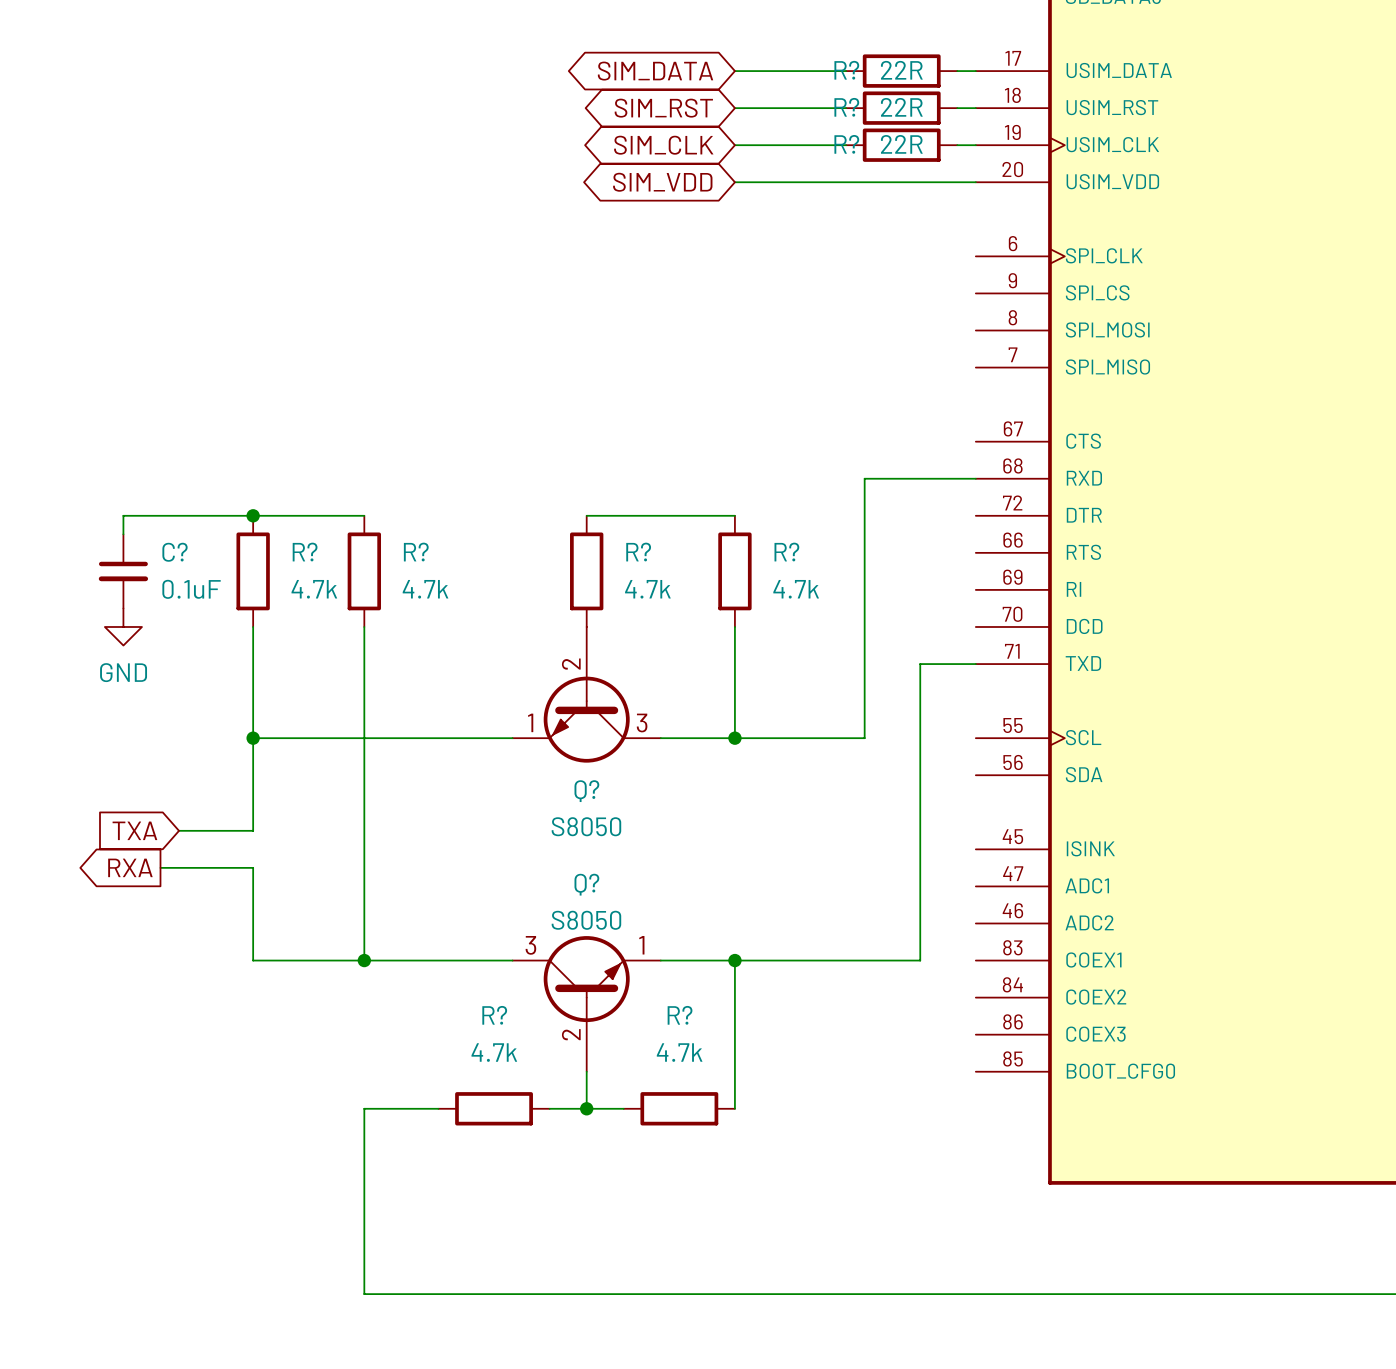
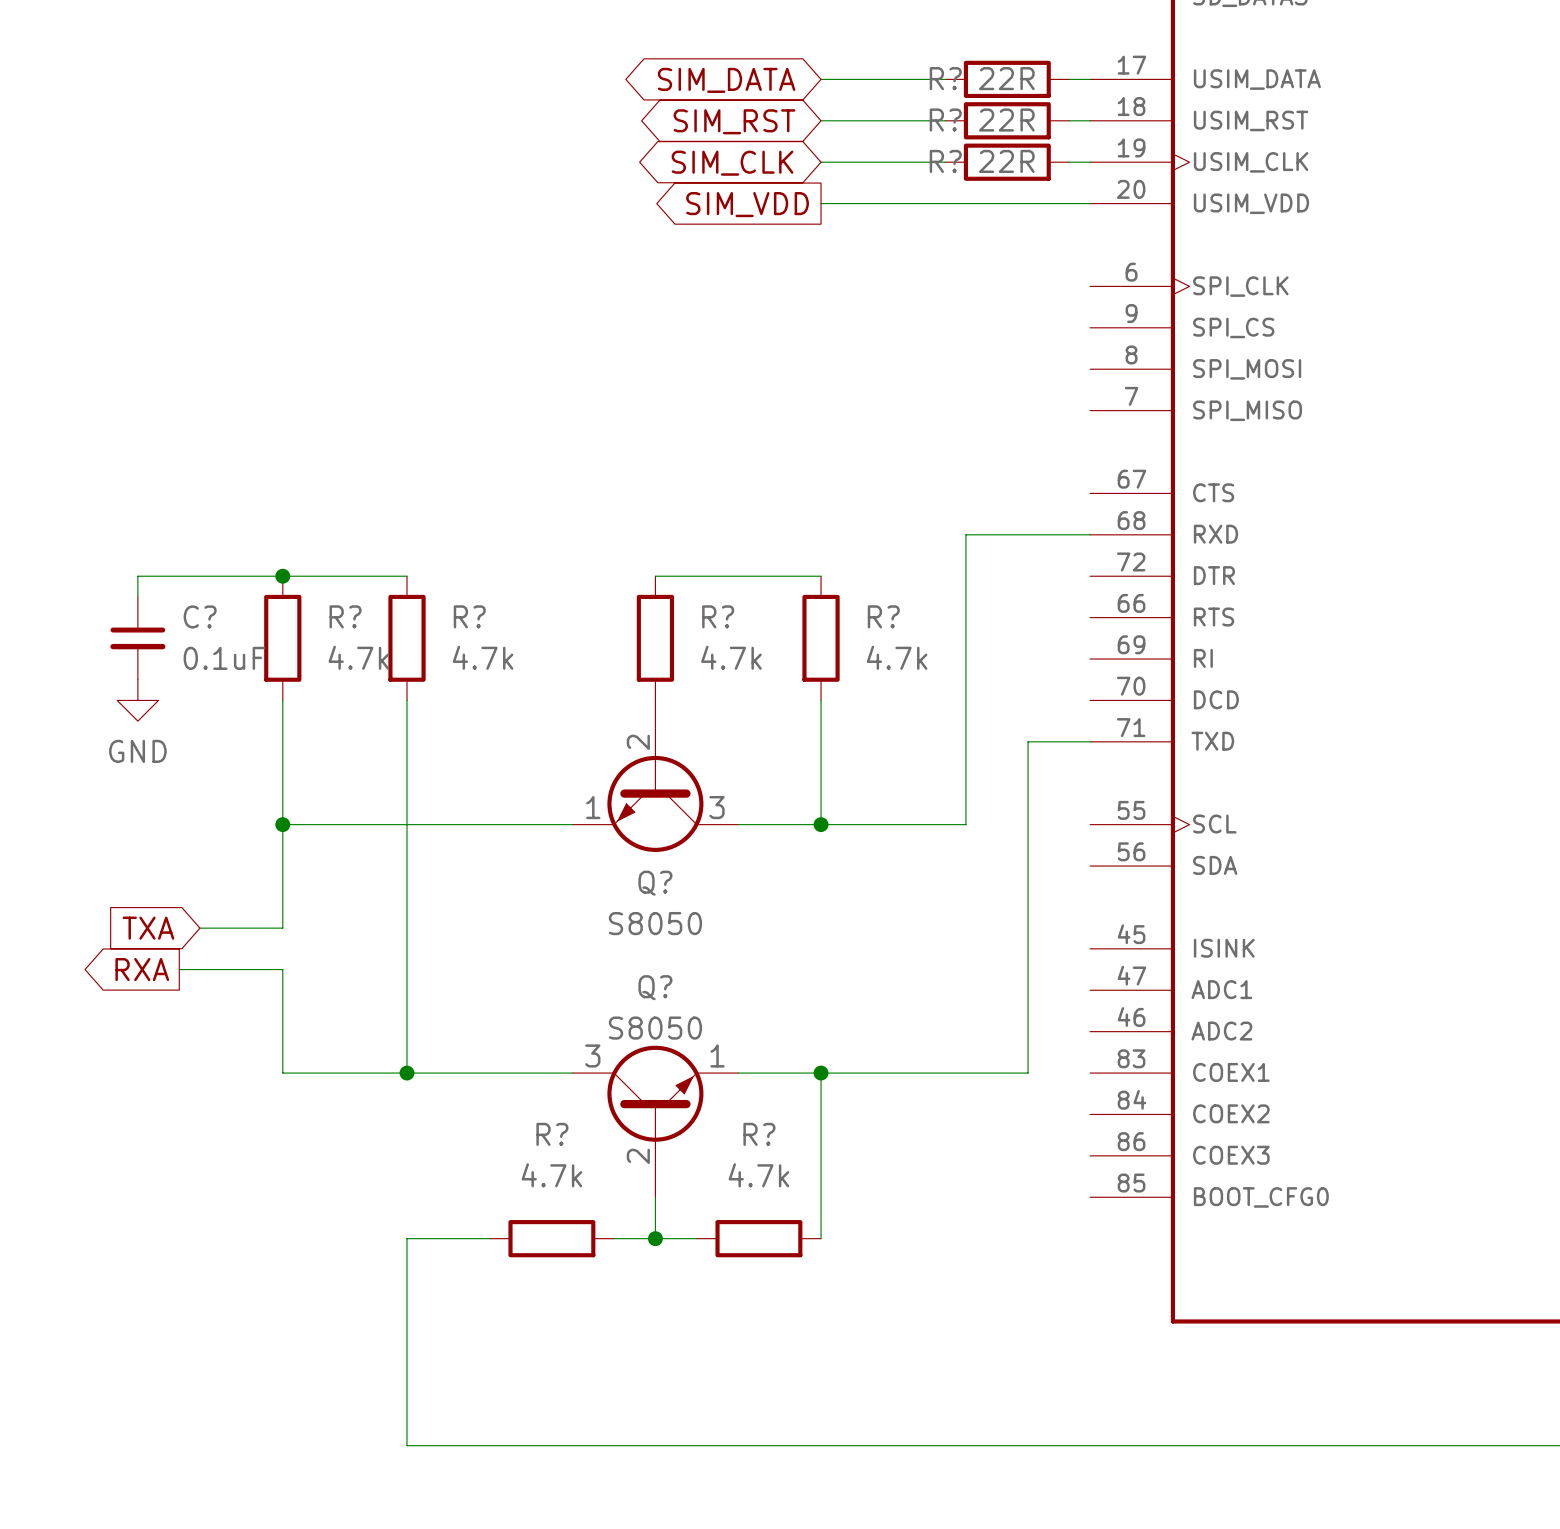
global label shape: bidirectional (662, 182) -> output (747, 204)

